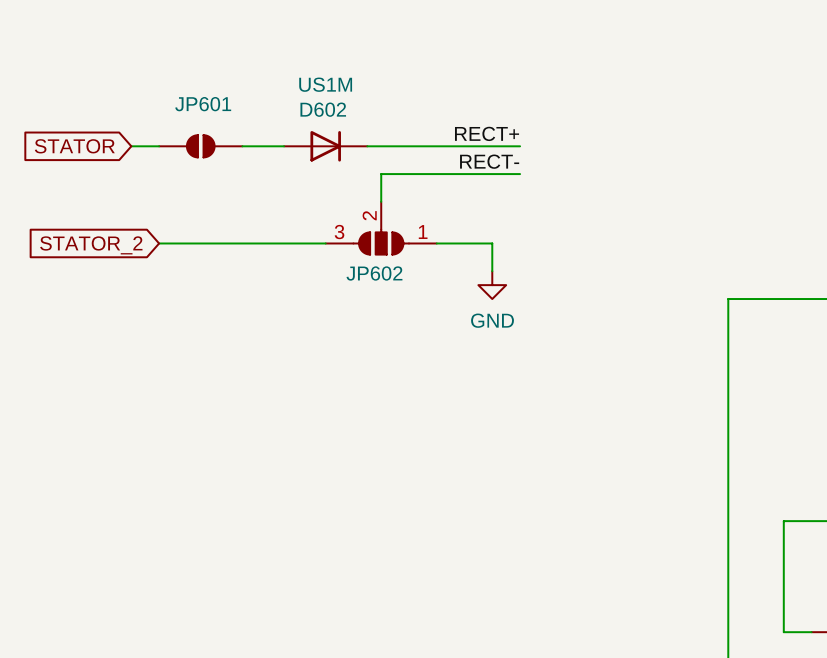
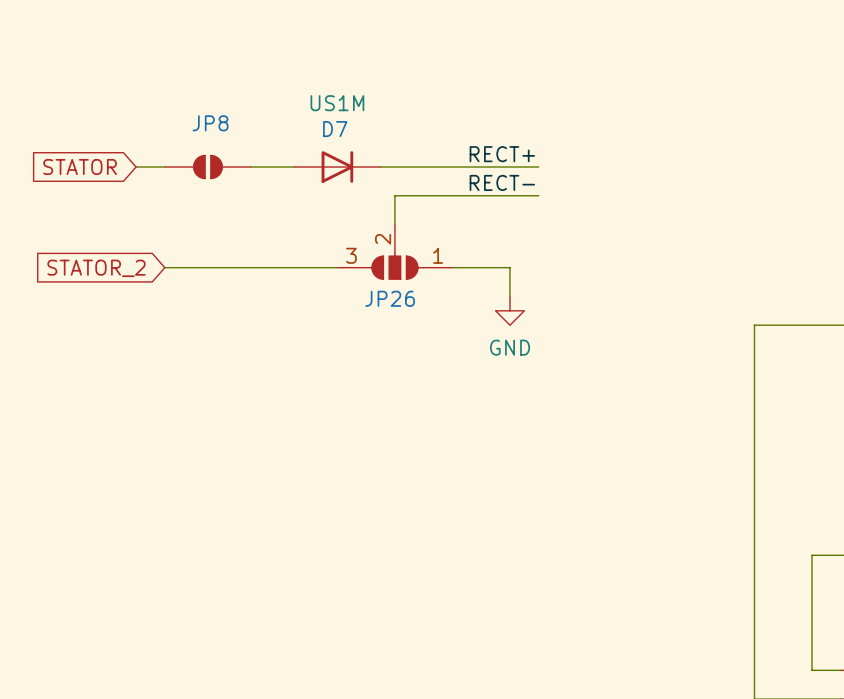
JP601 name: JP601 (203, 104) -> JP8 (210, 123)
D602 name: D602 (323, 109) -> D7 (335, 129)
JP602 name: JP602 (374, 273) -> JP26 (390, 298)

